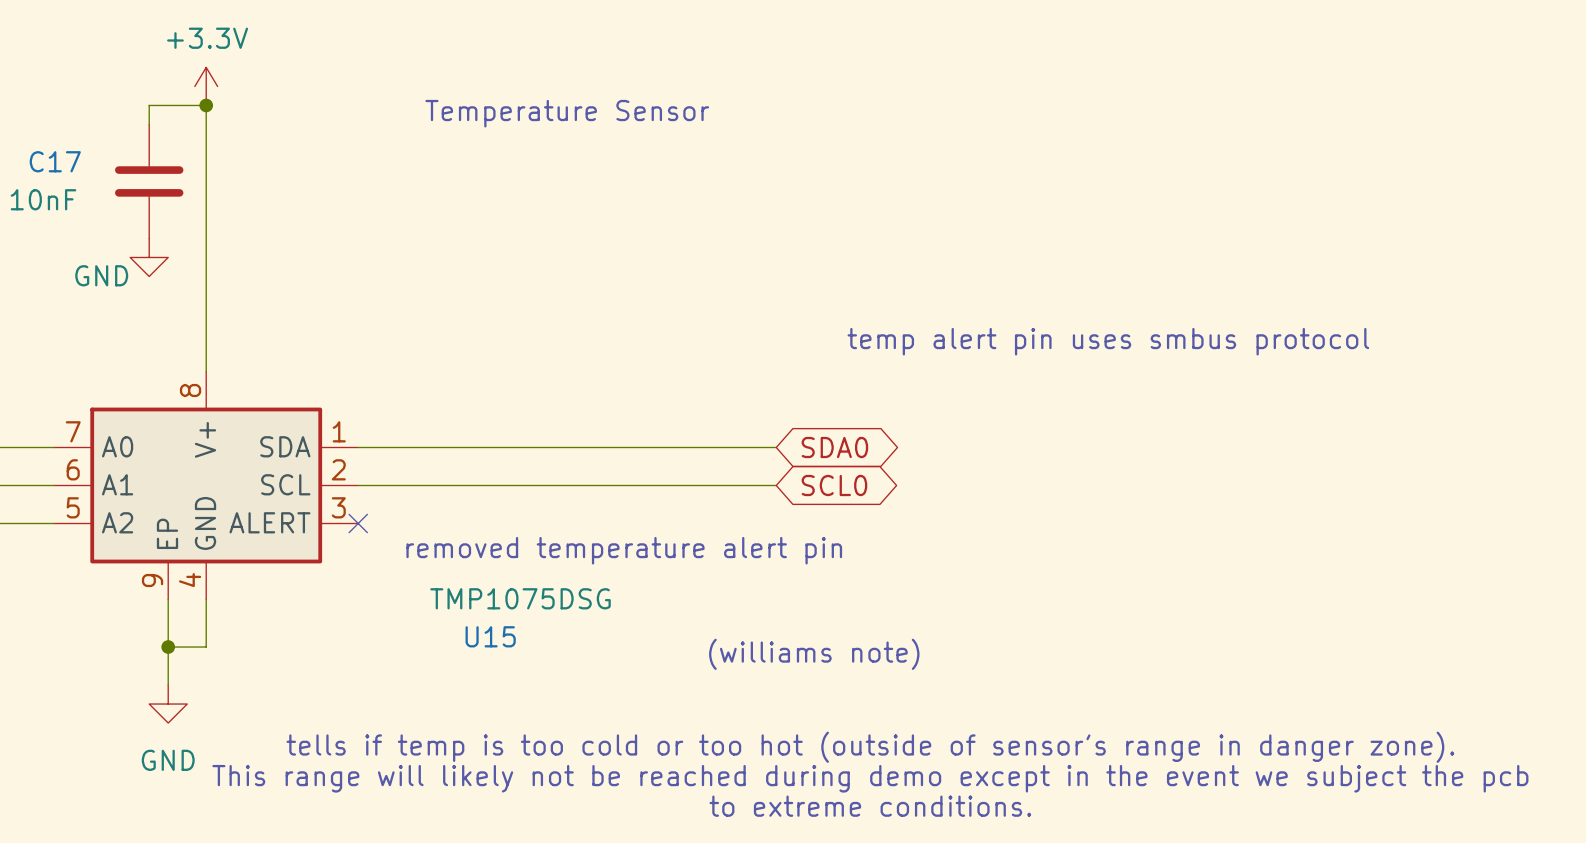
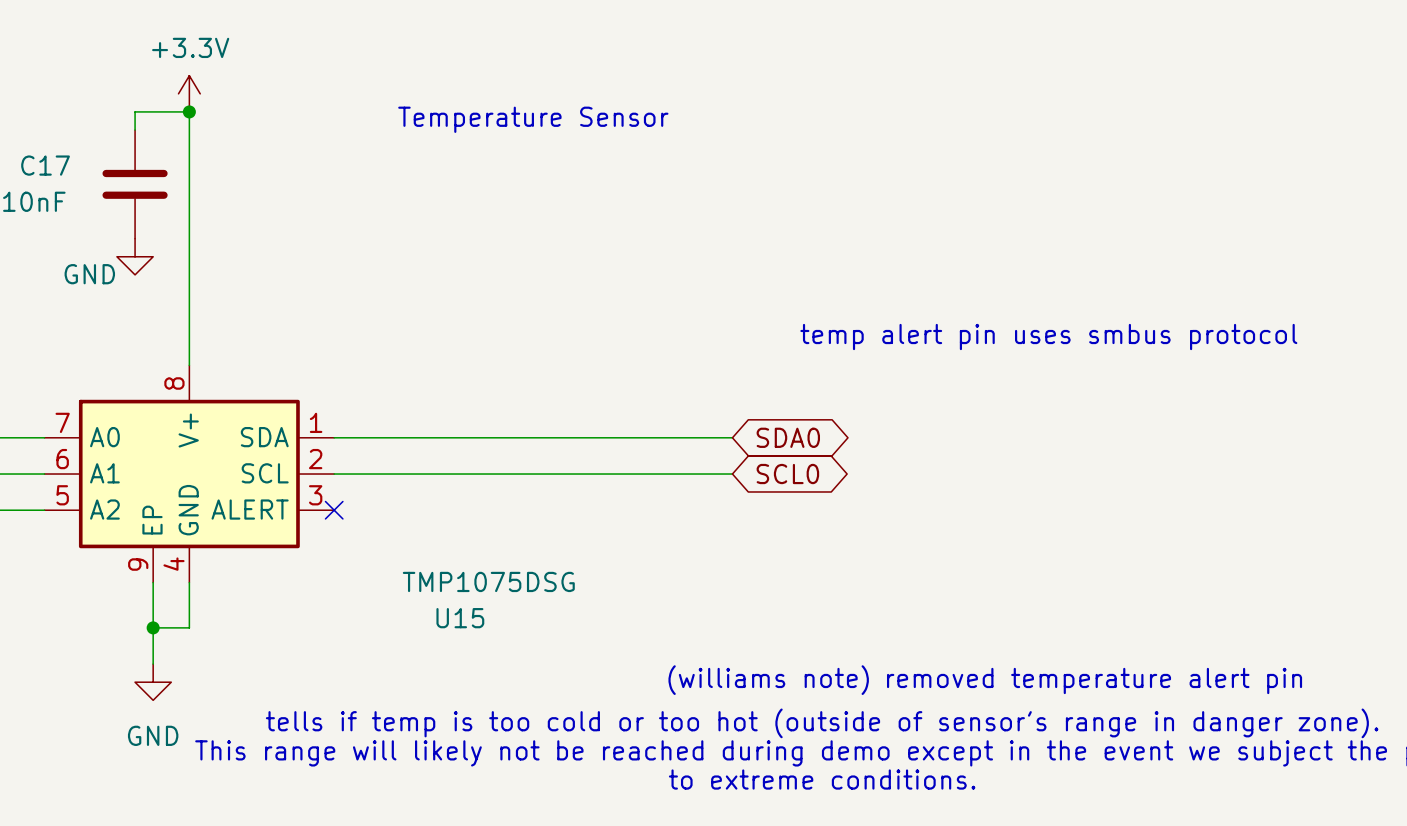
text: removed temperature alert pin (624, 550) -> none
text position: (williams note) (814, 654) -> (williams note) (768, 680)
text: none -> removed temperature alert pin (1094, 680)

